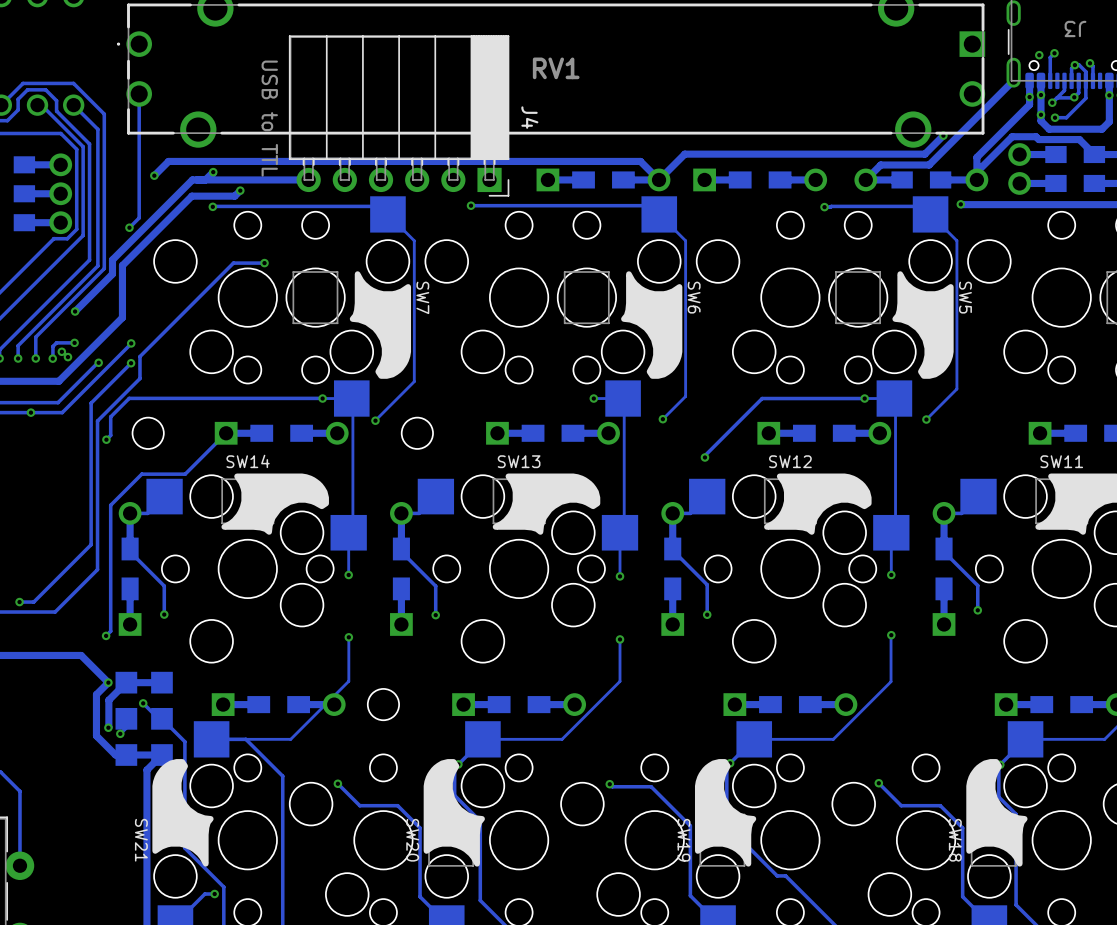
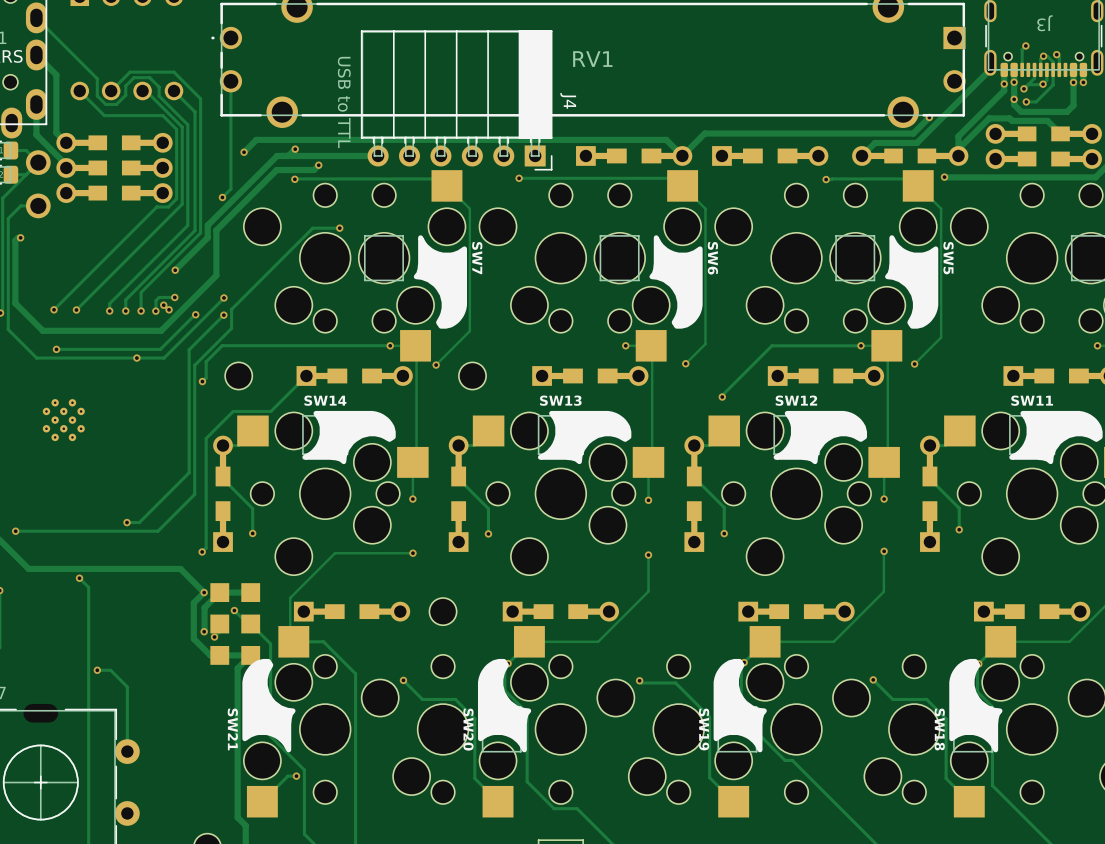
via: (1039, 55) -> none
track: (348, 637) (348, 681) (290, 739) (211, 739) -> (412, 553) (335, 553) (290, 598) (290, 638) (293, 641)

